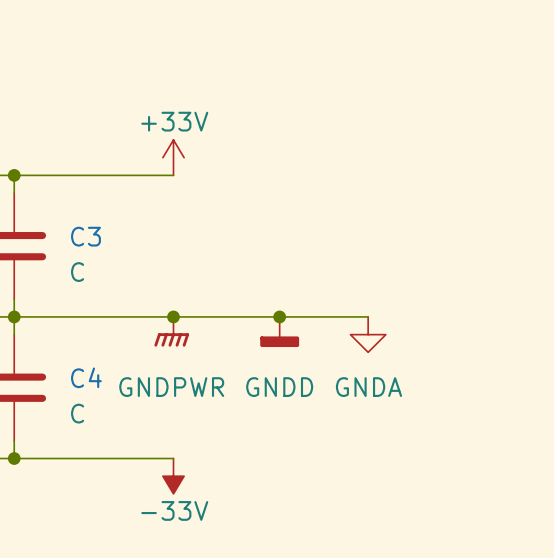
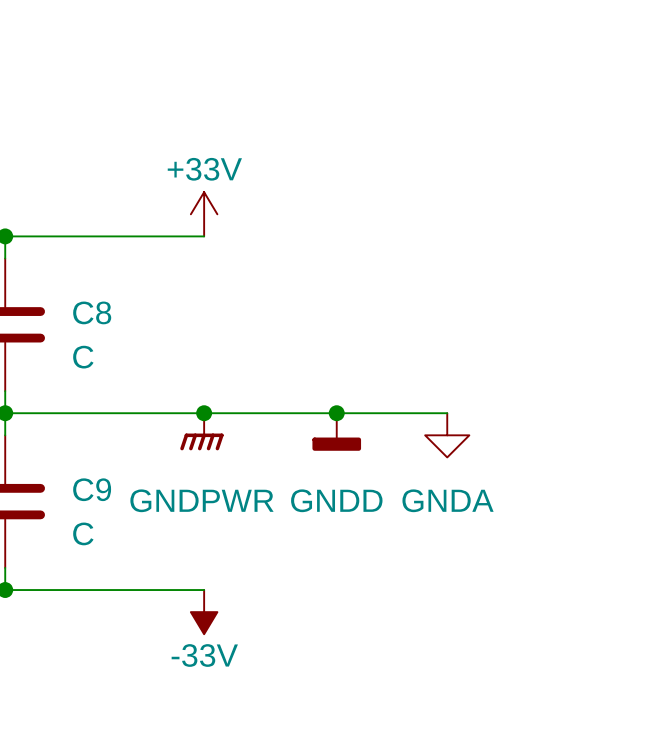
C3 name: C3 (85, 236) -> C8 (92, 312)
C4 name: C4 (86, 377) -> C9 (92, 489)

